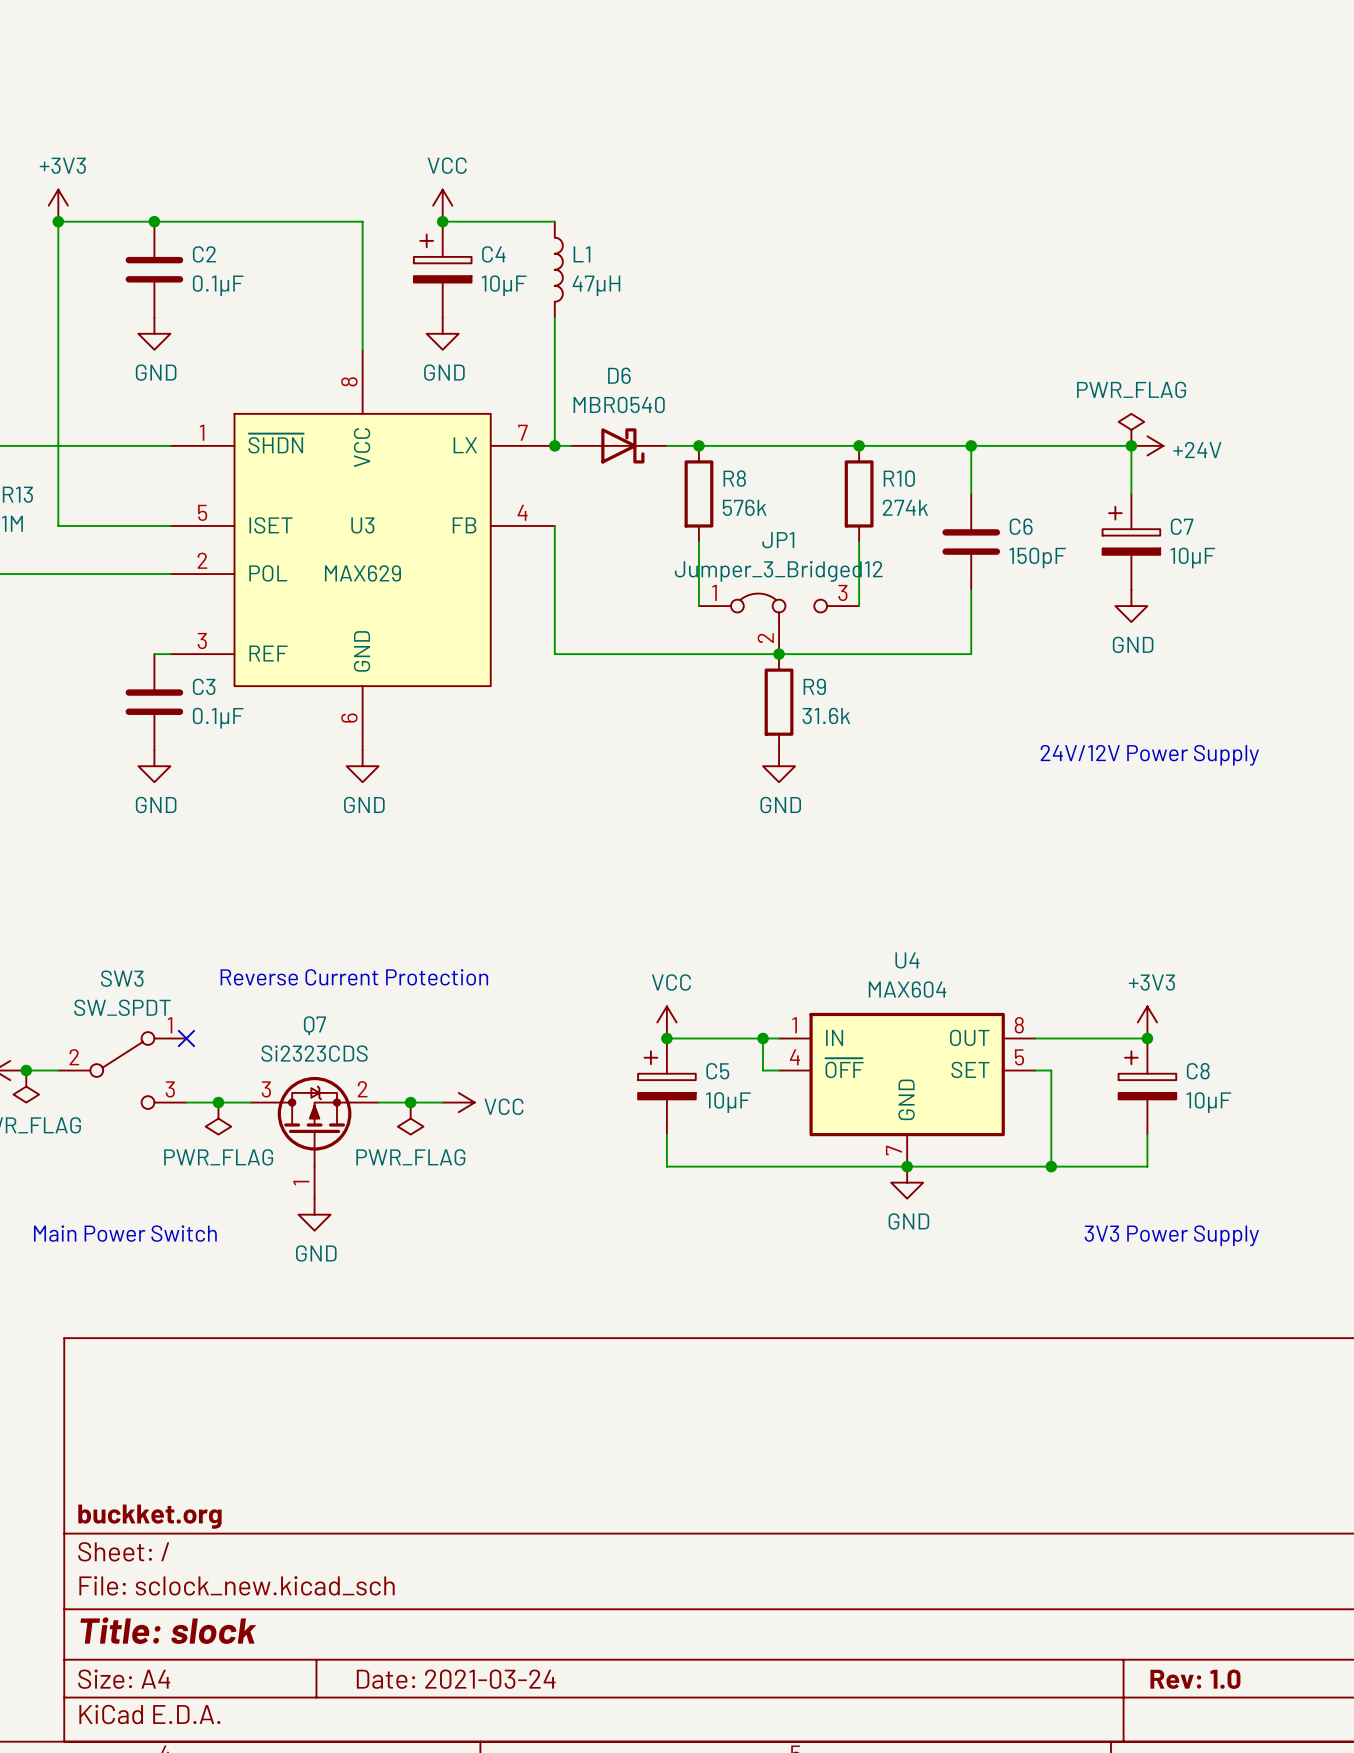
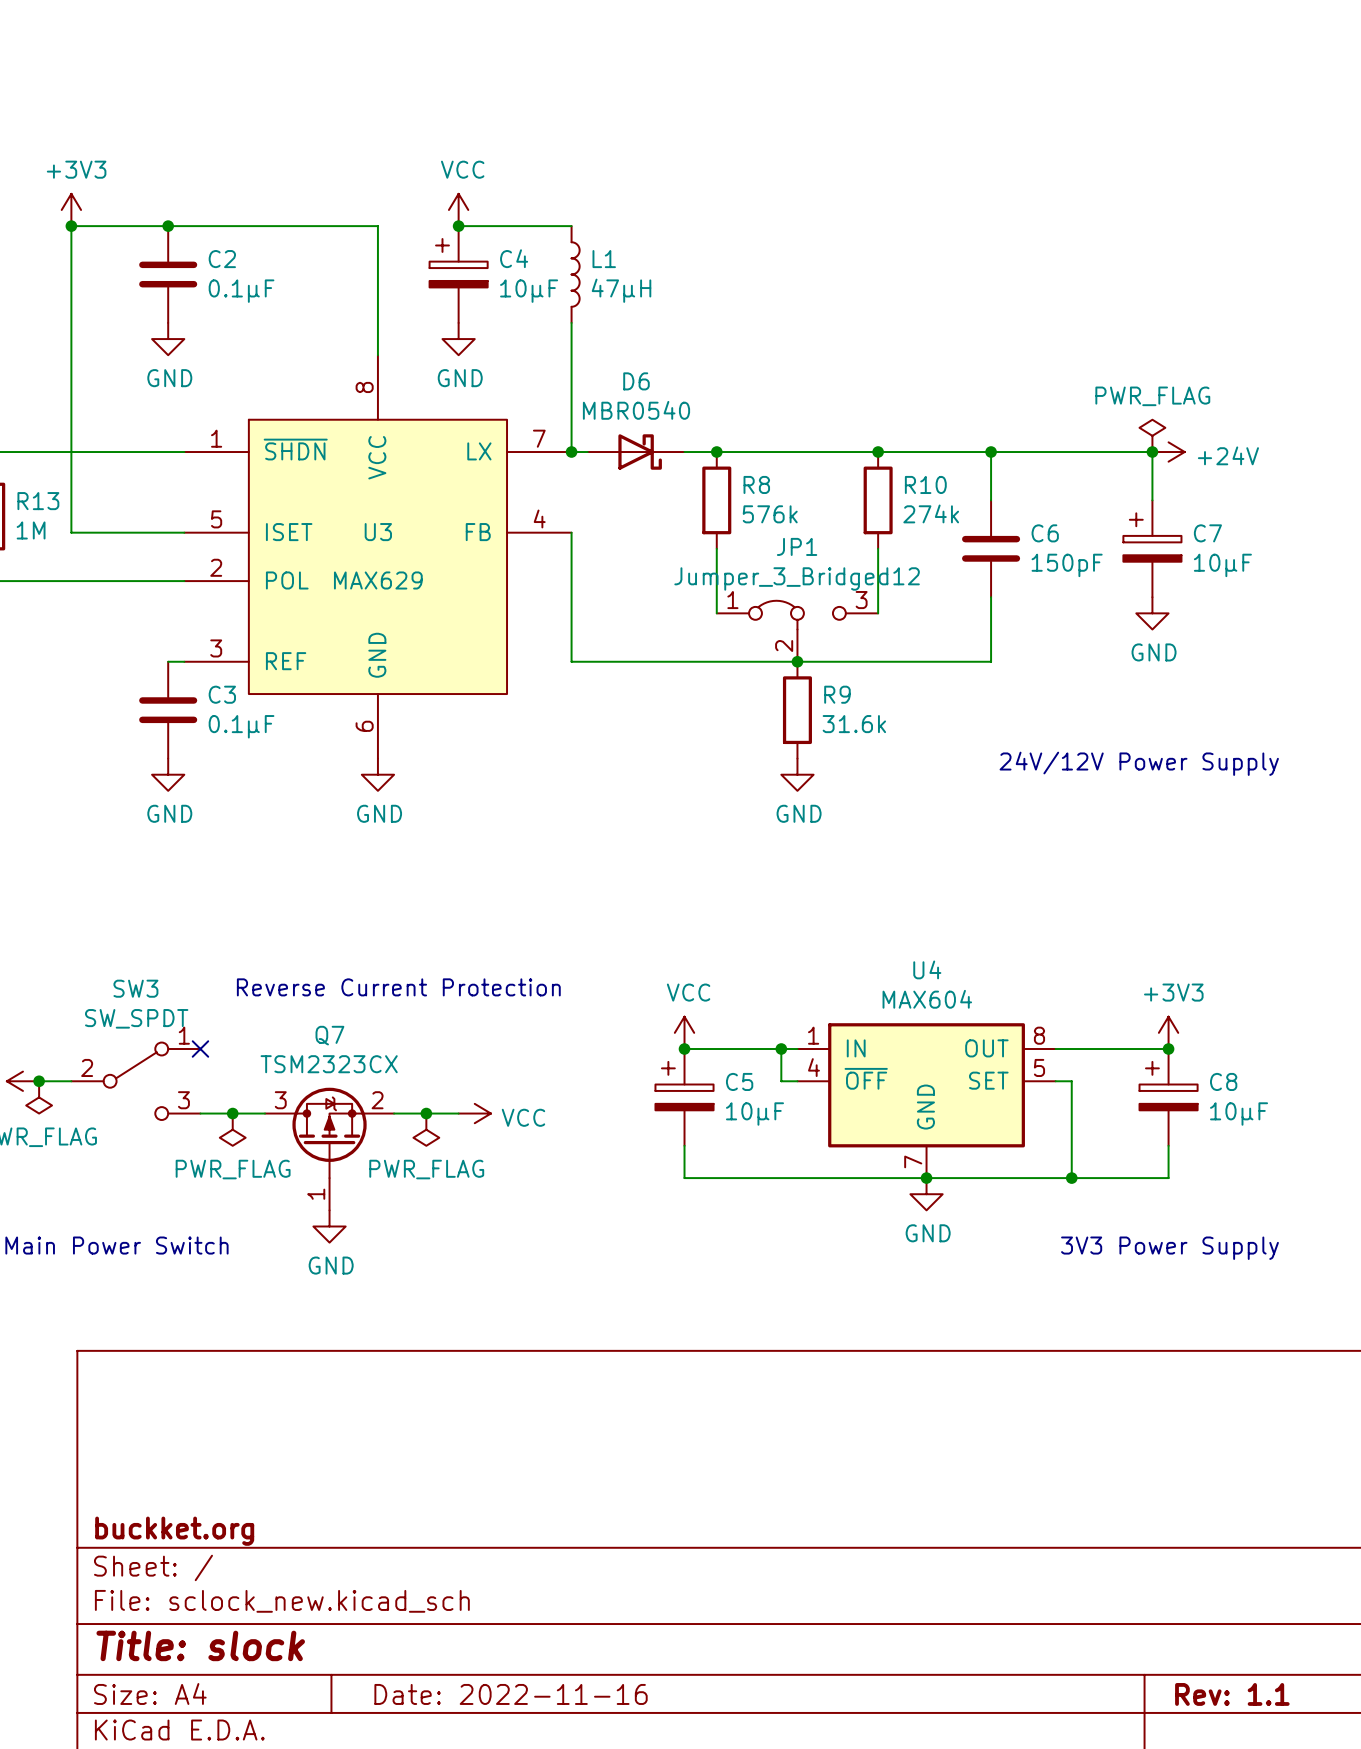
Q7 value: Si2323CDS (314, 1053) -> TSM2323CX (329, 1064)
title block: Date: 2021-03-24 (456, 1679) -> Date: 2022-11-16 (511, 1694)
title block: Rev: 1.0 (1195, 1679) -> Rev: 1.1 (1232, 1694)

